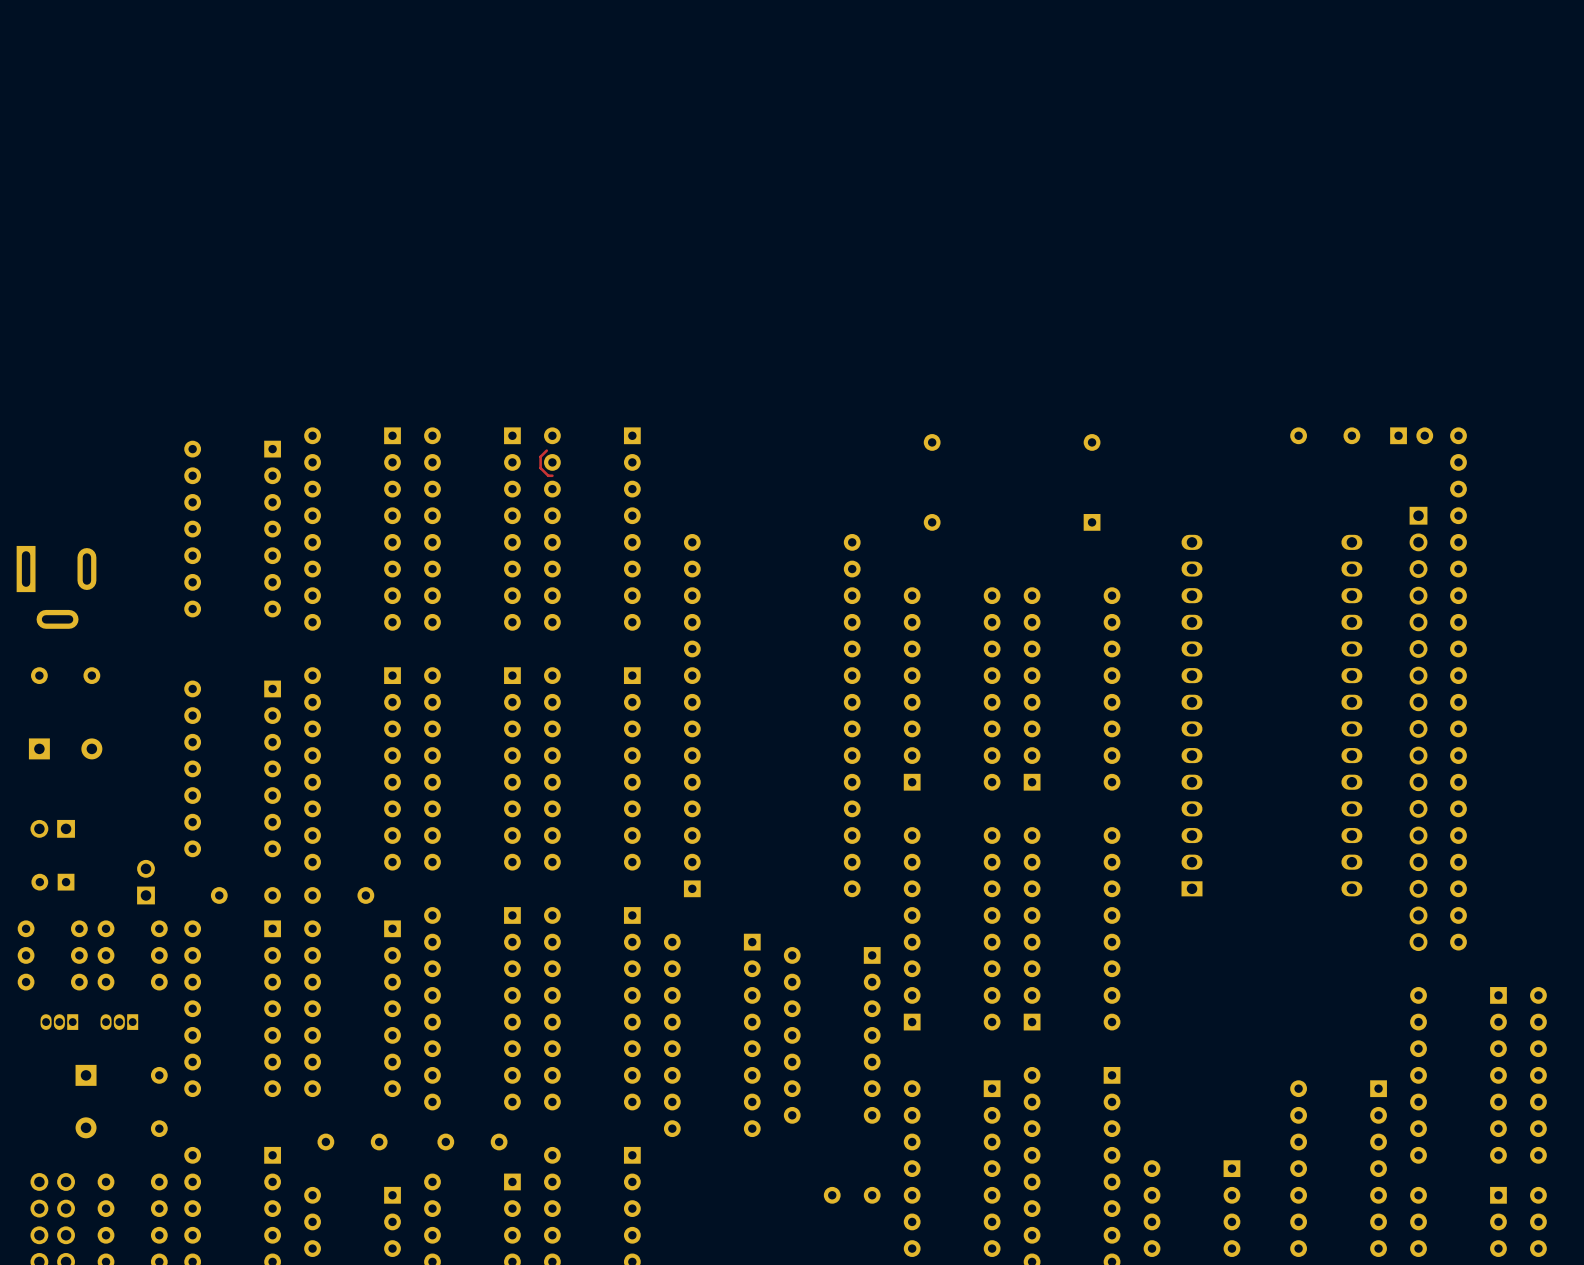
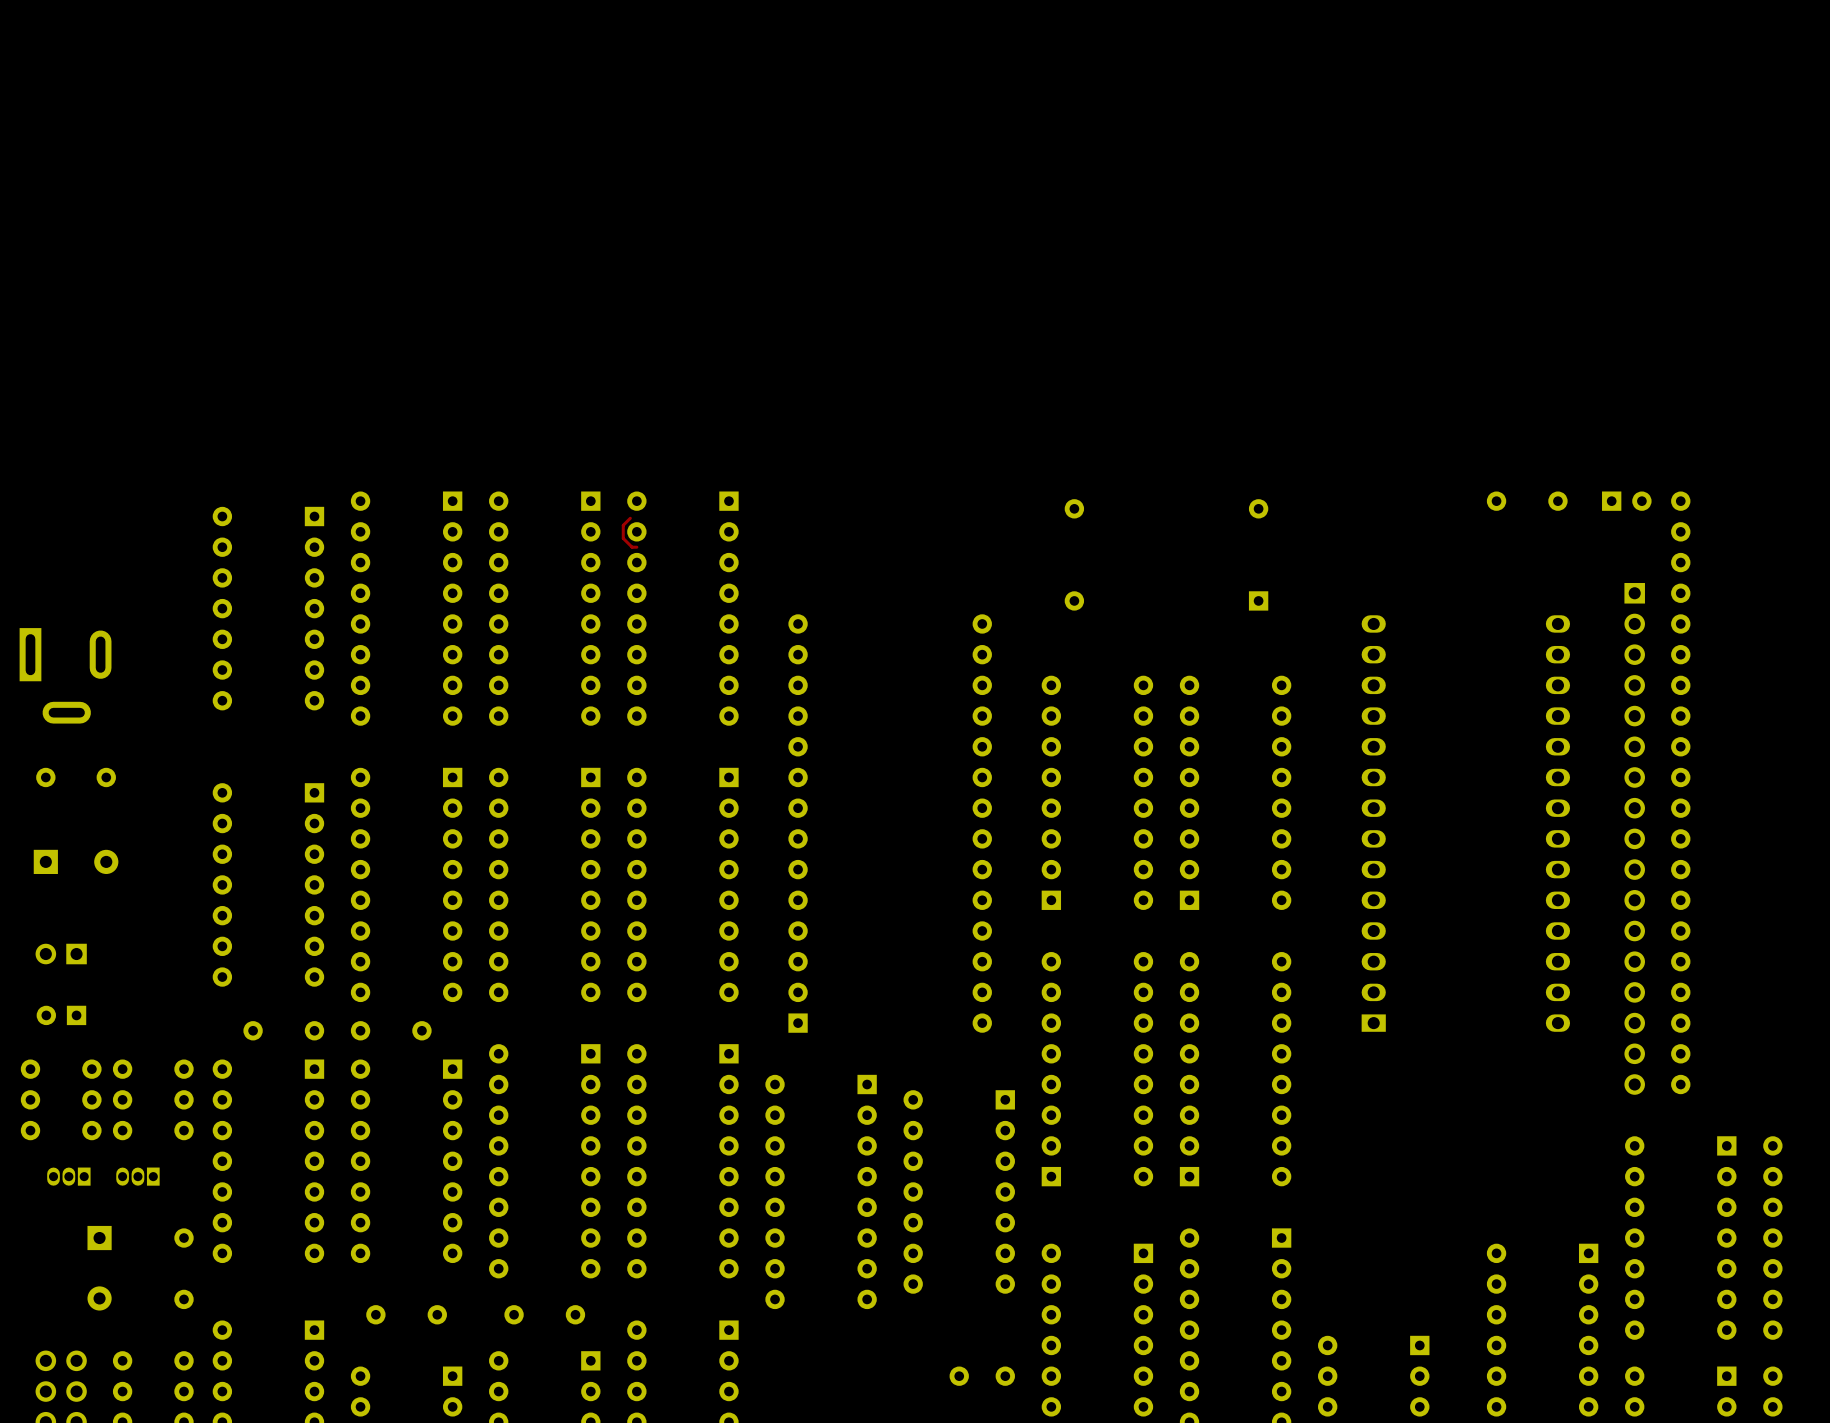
part: (146, 882) -> none

